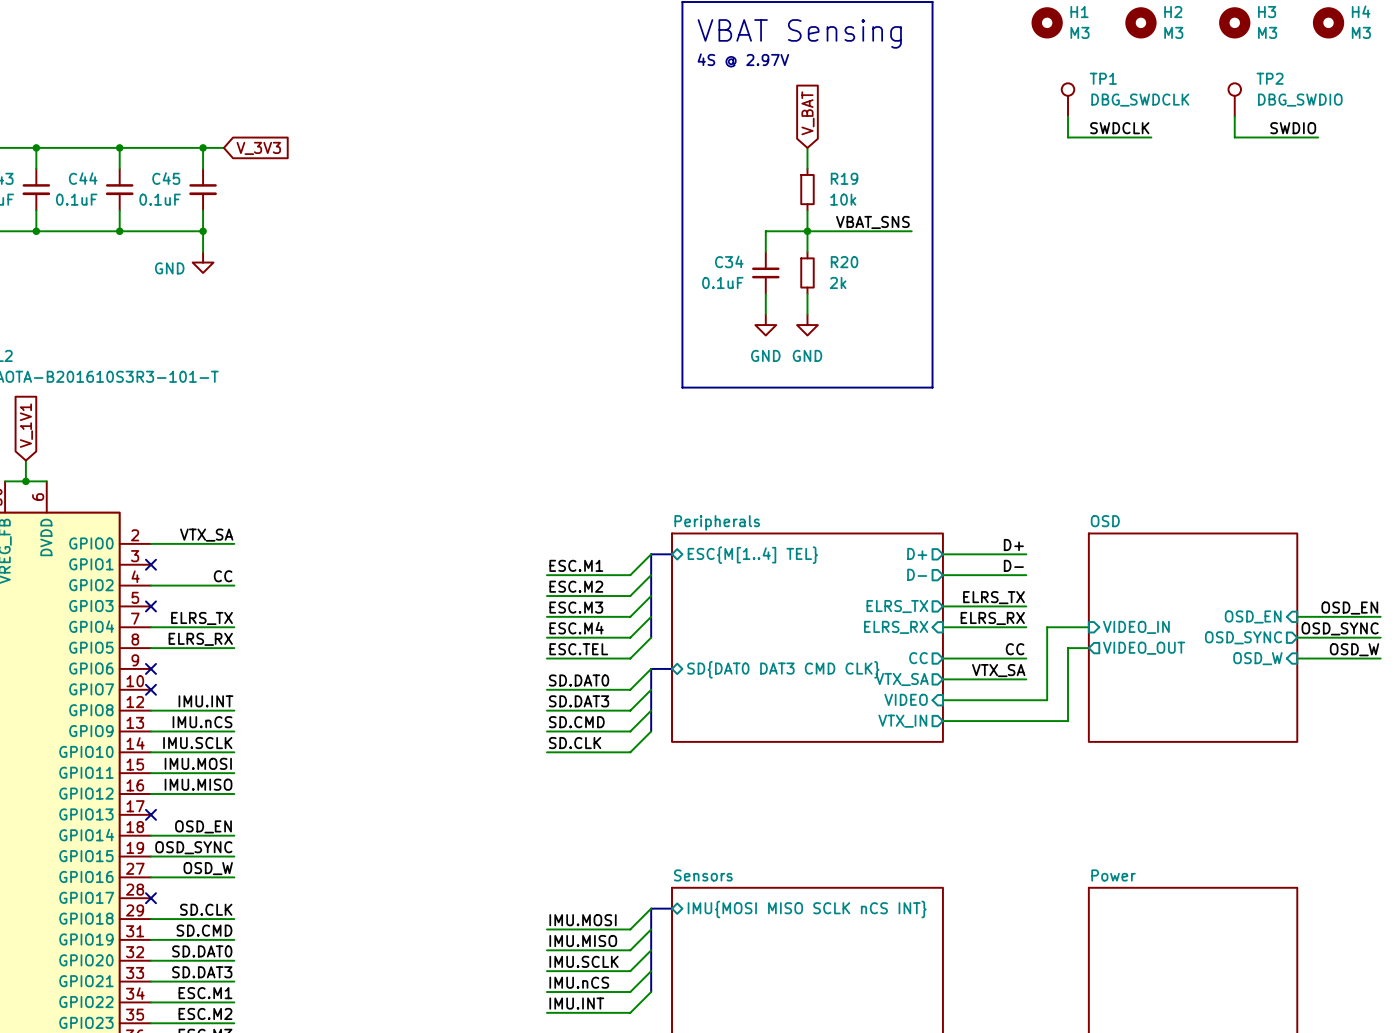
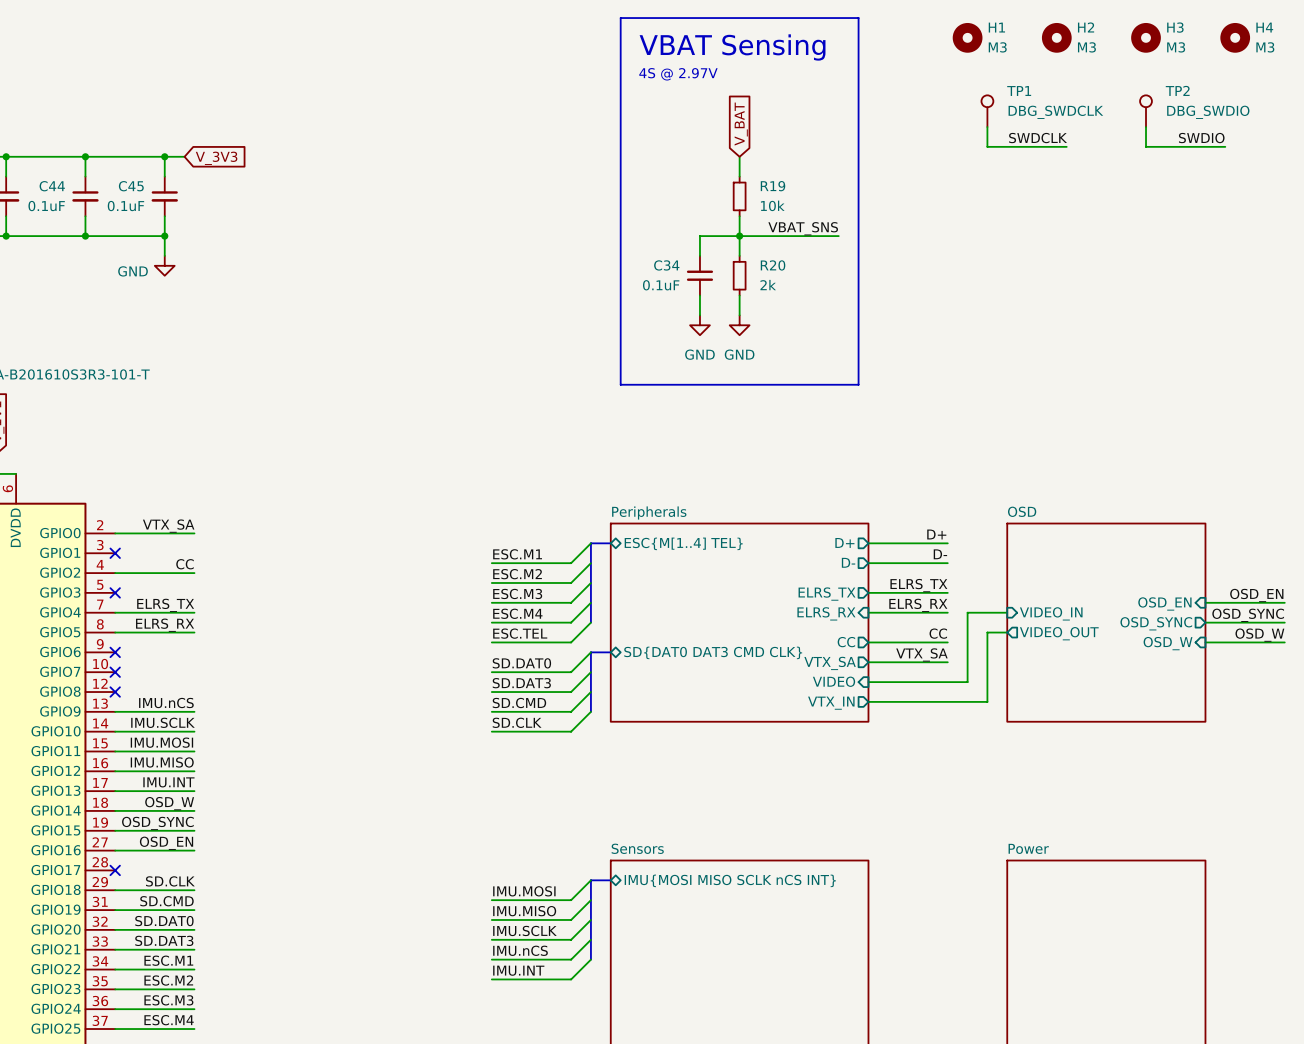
label position: IMU.INT (205, 701) -> IMU.INT (168, 782)
wire: (150, 710) (234, 710) -> (115, 791) (194, 791)
no-connect mark: none -> (115, 692)
no-connect mark: (150, 814) -> none
label: OSD_EN (203, 826) -> OSD_W (169, 803)
label: OSD_W (208, 868) -> OSD_EN (166, 843)

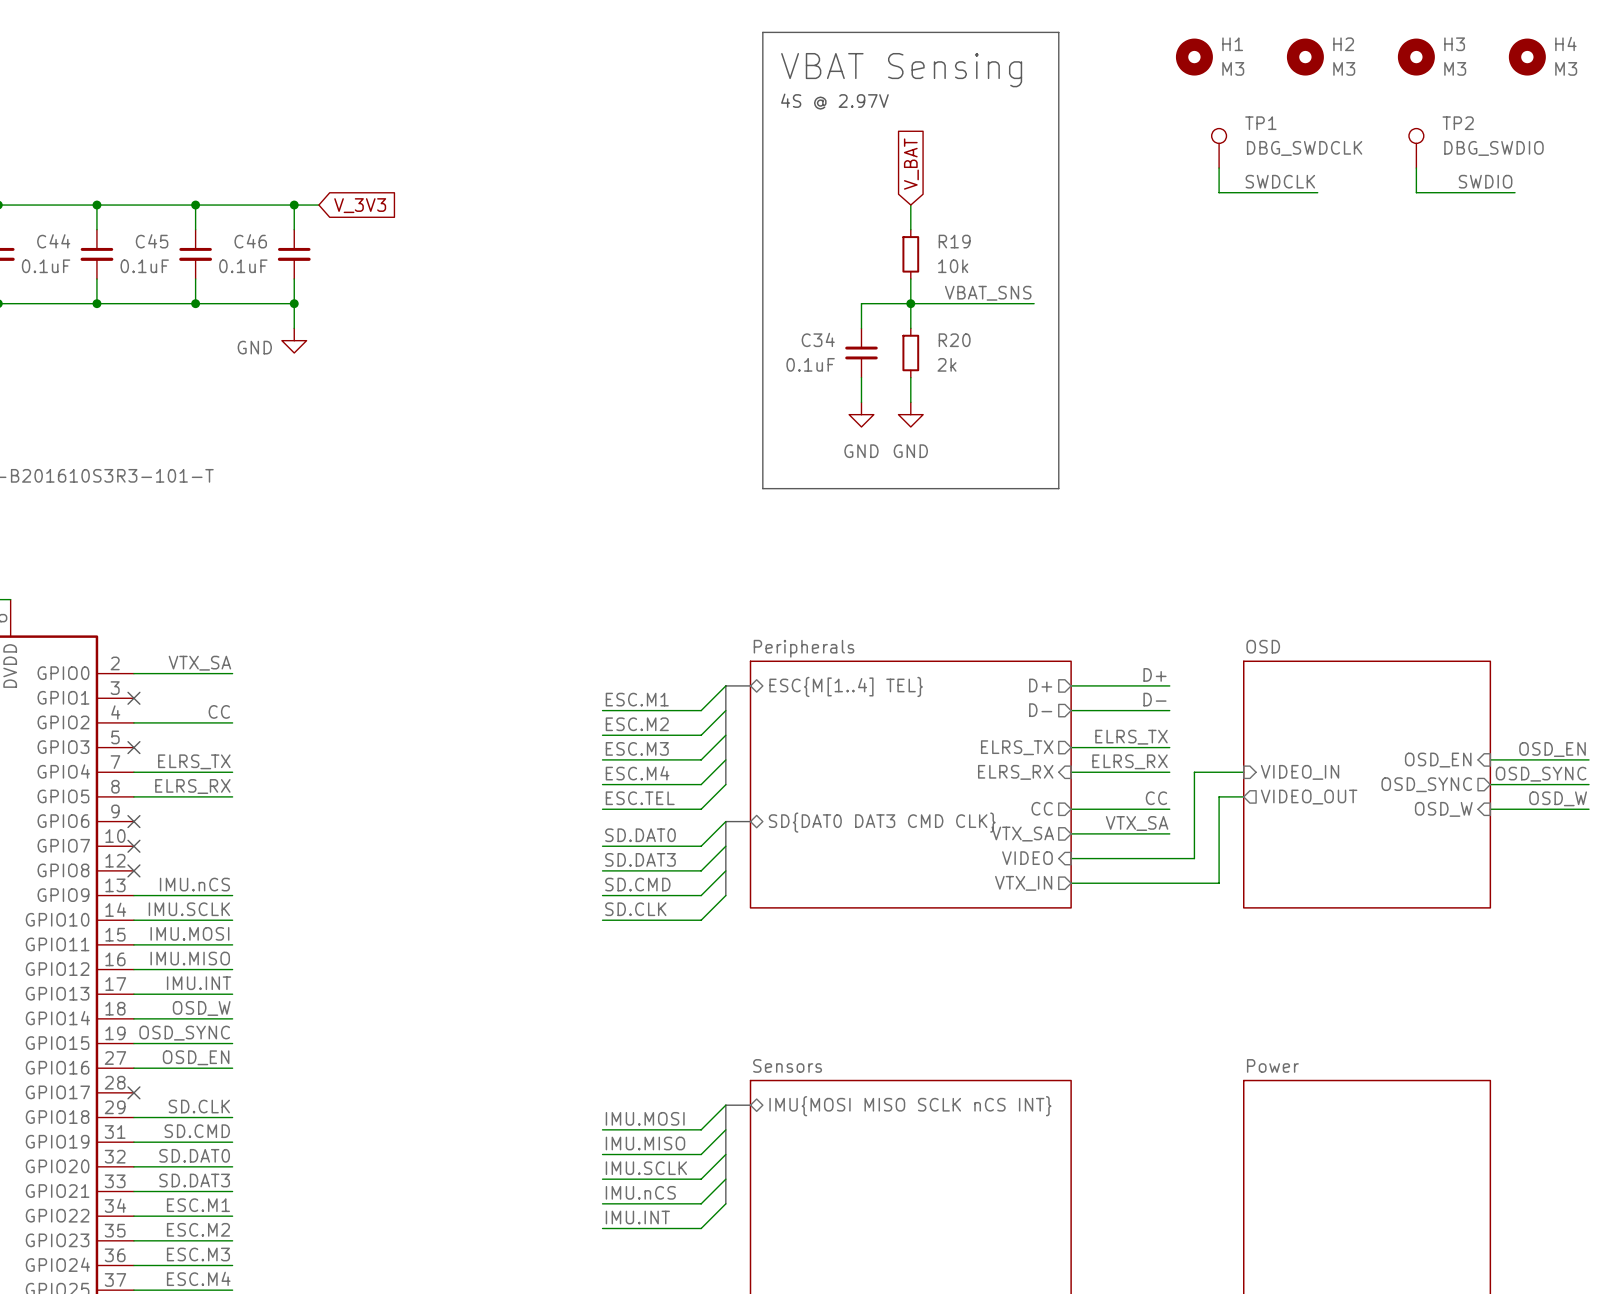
wire: none -> (220, 205) (318, 205)
wire: none -> (294, 205) (294, 229)
junction: none -> (294, 205)
global label position: V_3V3 (216, 158) -> V_3V3 (360, 205)
C46: none -> 0.1uF (294, 254)
wire: none -> (294, 279) (294, 328)
wire: (164, 236) (164, 255) -> (195, 303) (294, 303)
junction: none -> (294, 303)
power symbol position: GND (164, 265) -> GND (294, 340)

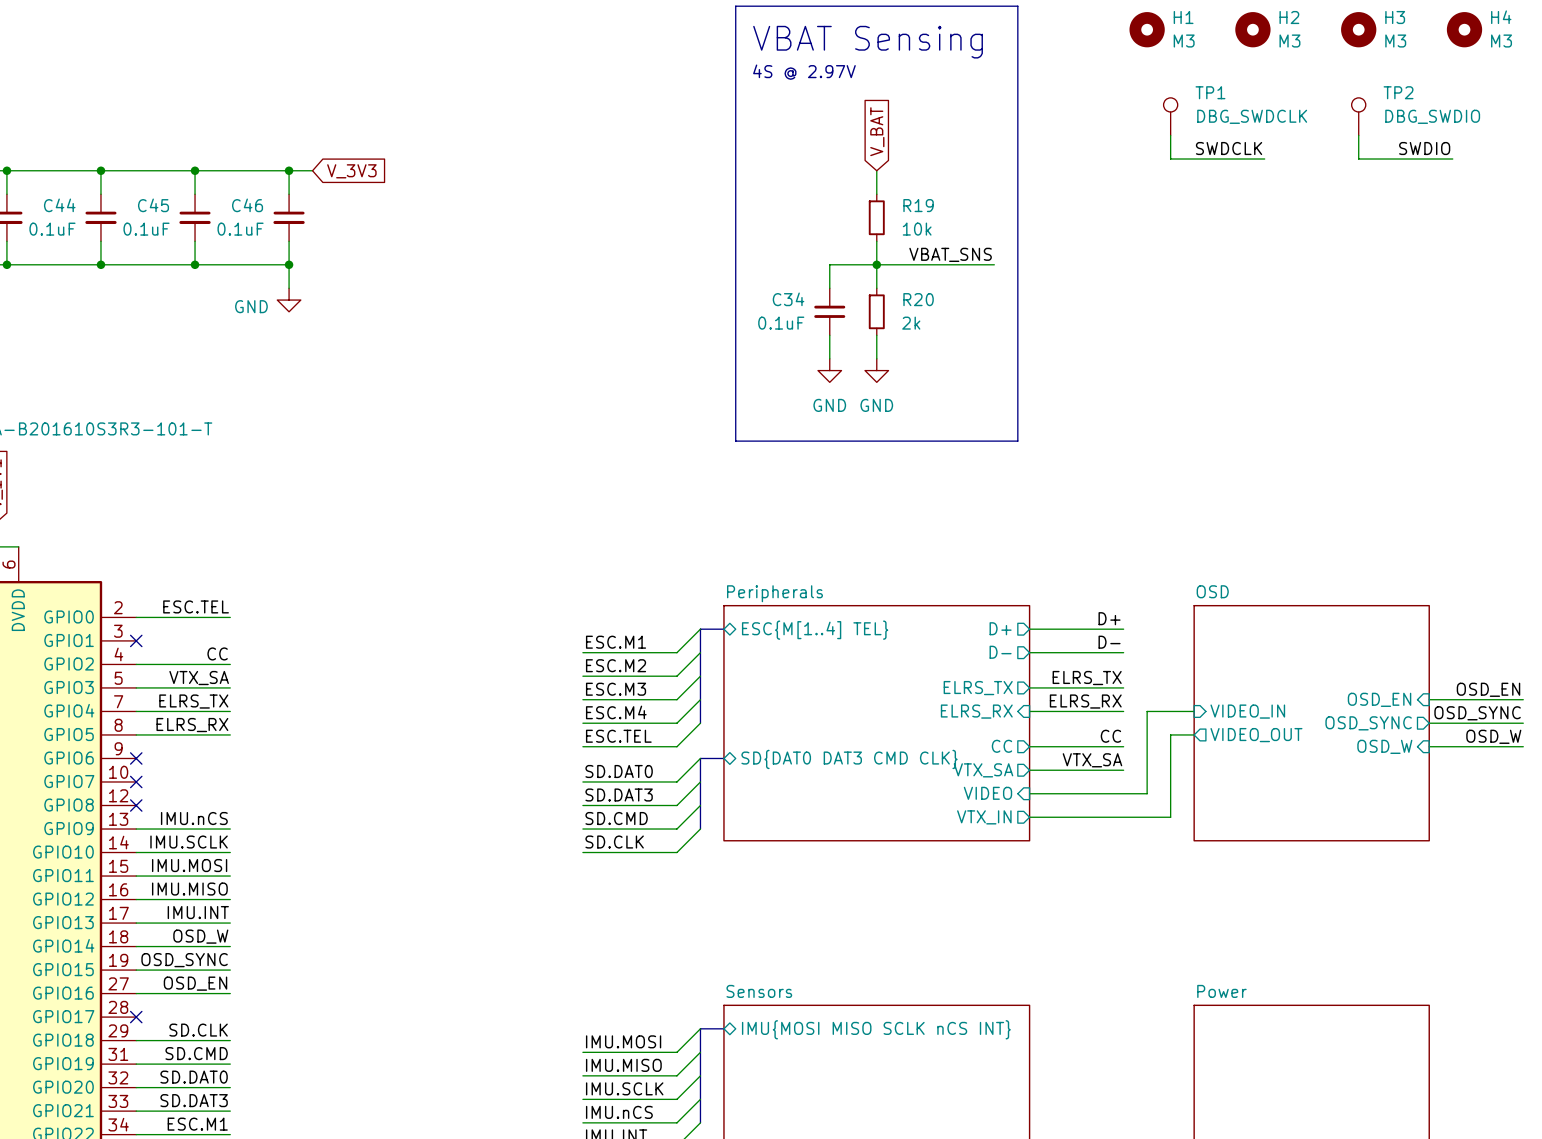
label: VTX_SA (199, 663) -> ESC.TEL (196, 606)
label: none -> VTX_SA (199, 678)
wire: none -> (136, 687) (230, 687)
no-connect mark: (133, 747) -> none

